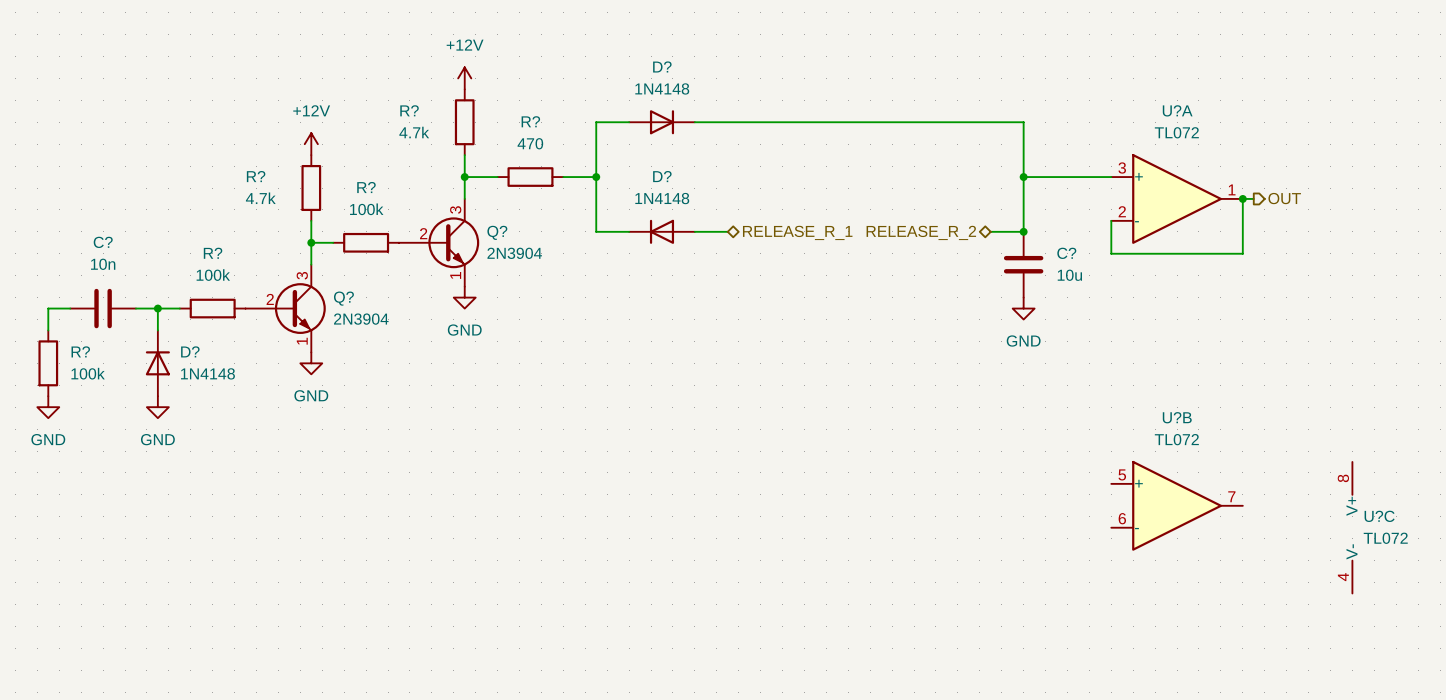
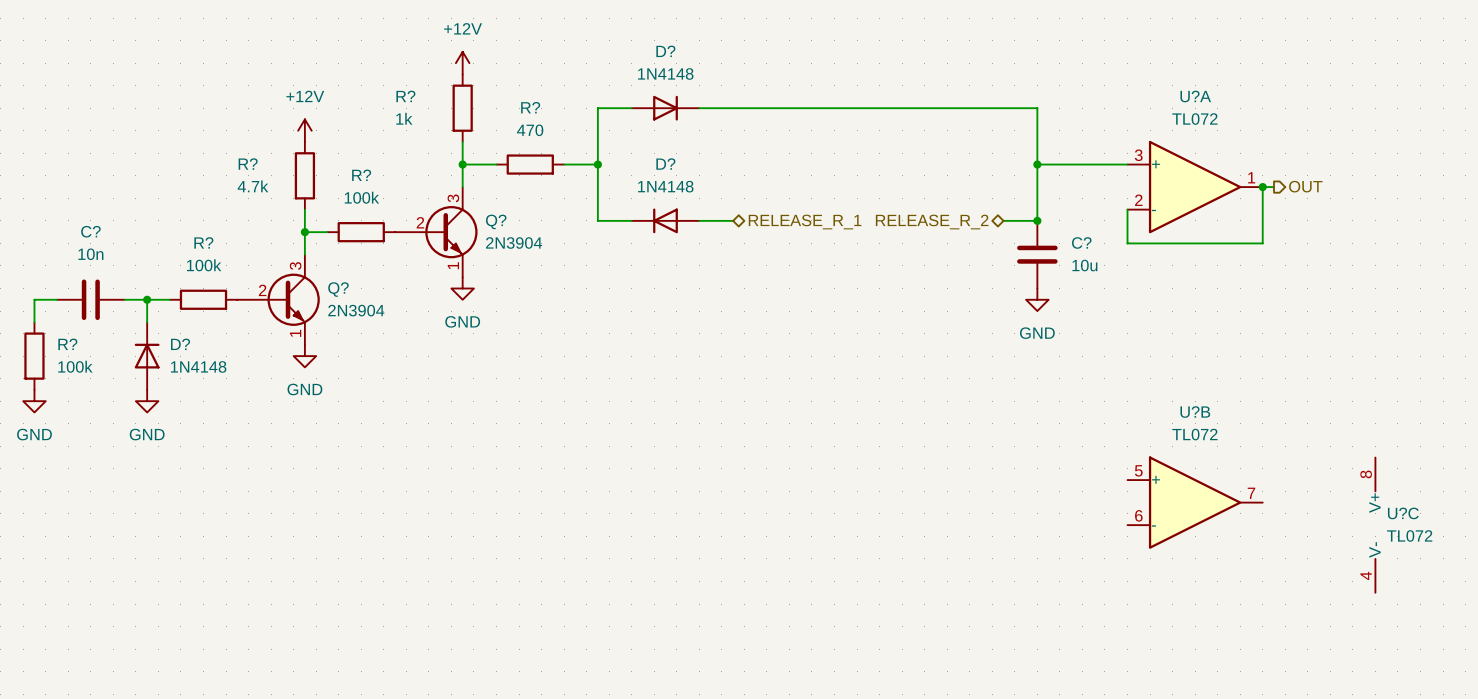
R? value: 4.7k (414, 132) -> 1k (404, 118)

